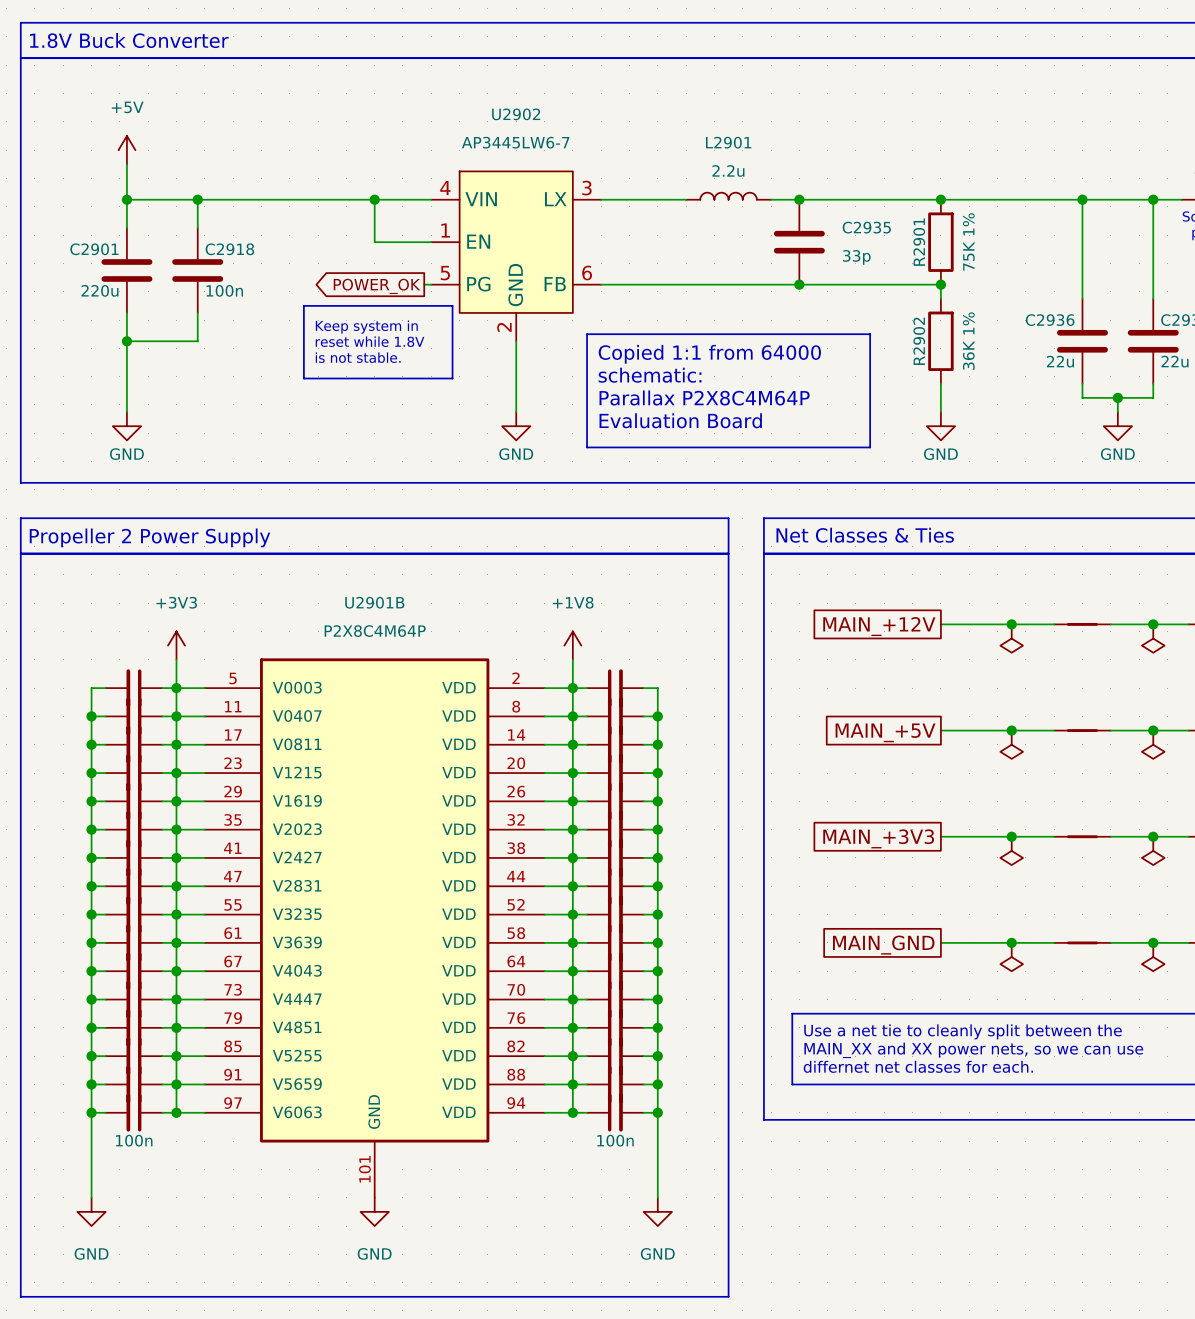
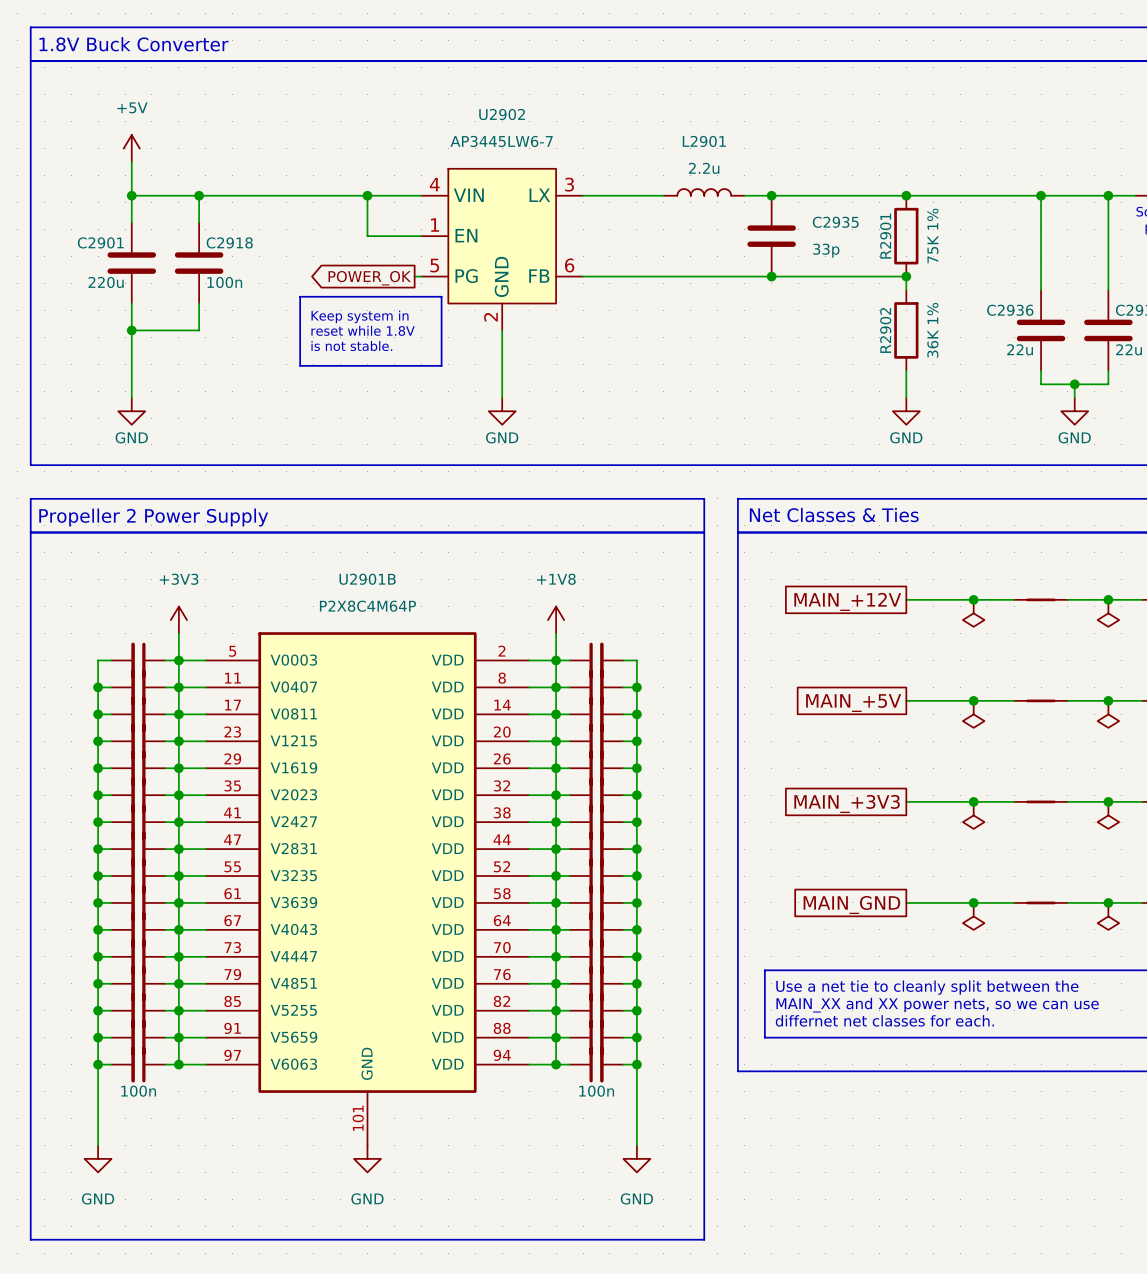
line: (587, 334) (870, 334) (870, 447) (587, 447) (587, 334) -> none
text: Copied 1:1 from 64000 (709, 354) -> none
text: schematic: (650, 375) -> none
text: Parallax P2X8C4M64P (704, 397) -> none
text: Evaluation Board (680, 420) -> none

